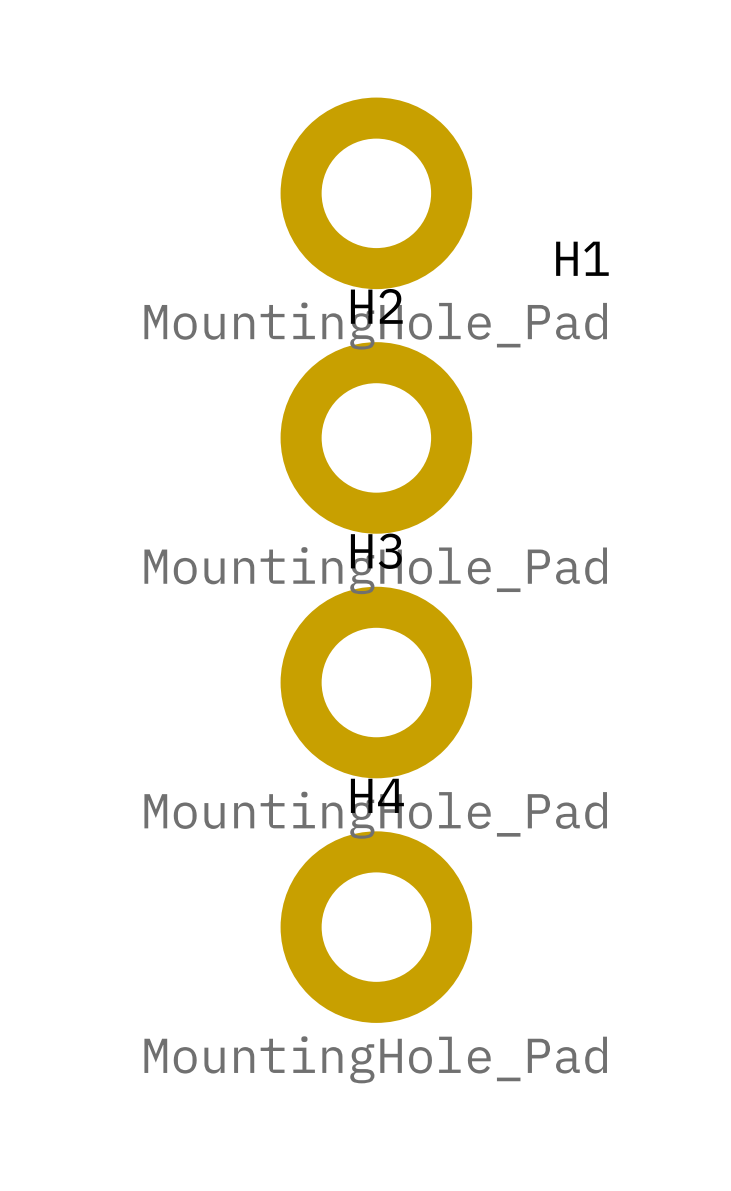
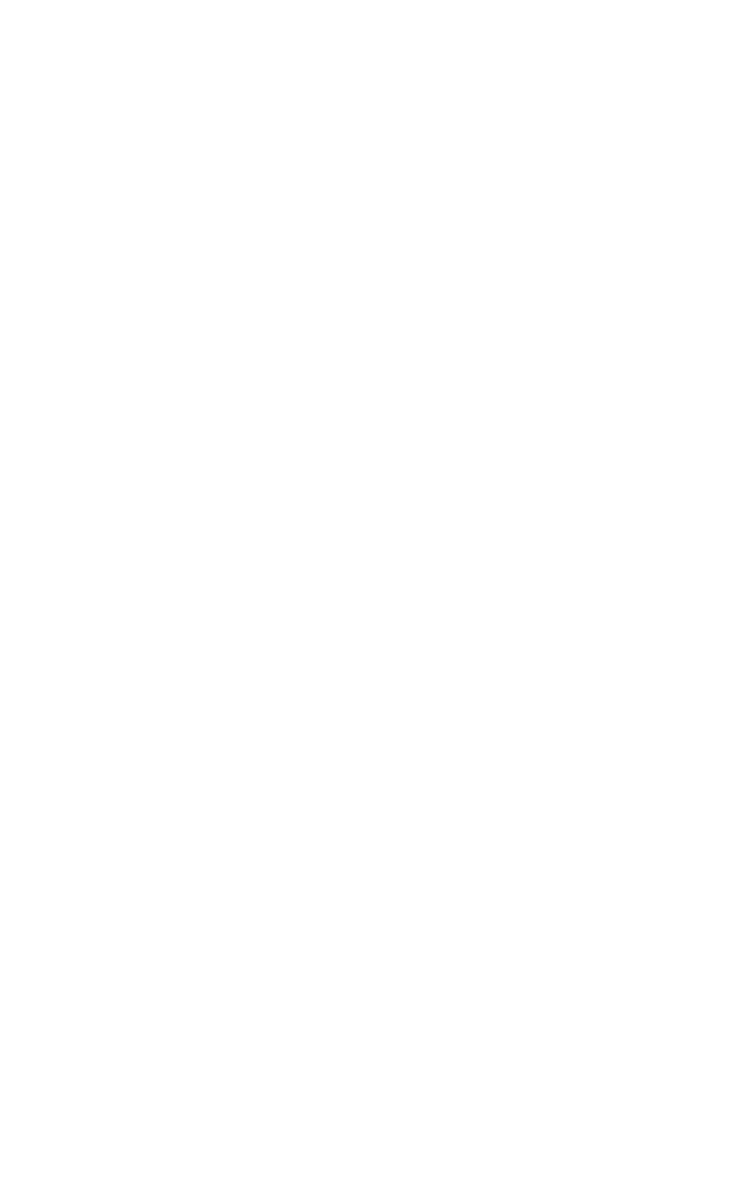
H1: MountingHole_Pad (376, 193) -> none
H2: MountingHole_Pad (376, 437) -> none
H3: MountingHole_Pad (376, 682) -> none
H4: MountingHole_Pad (376, 927) -> none

